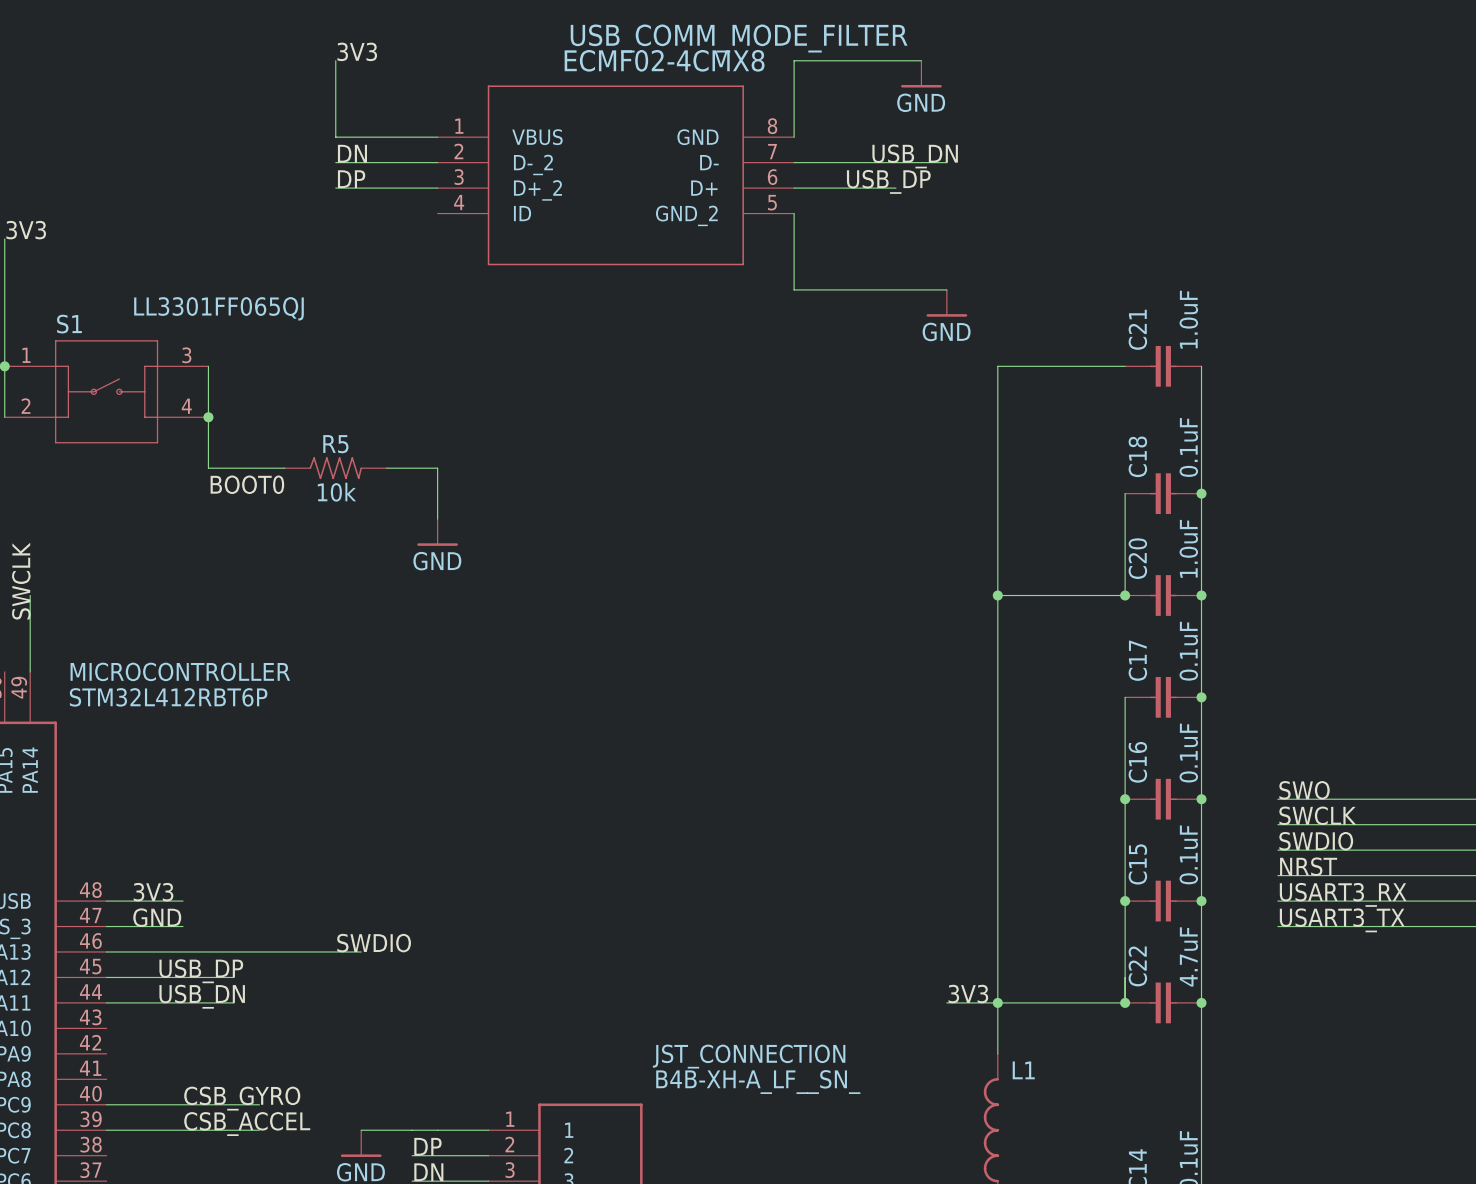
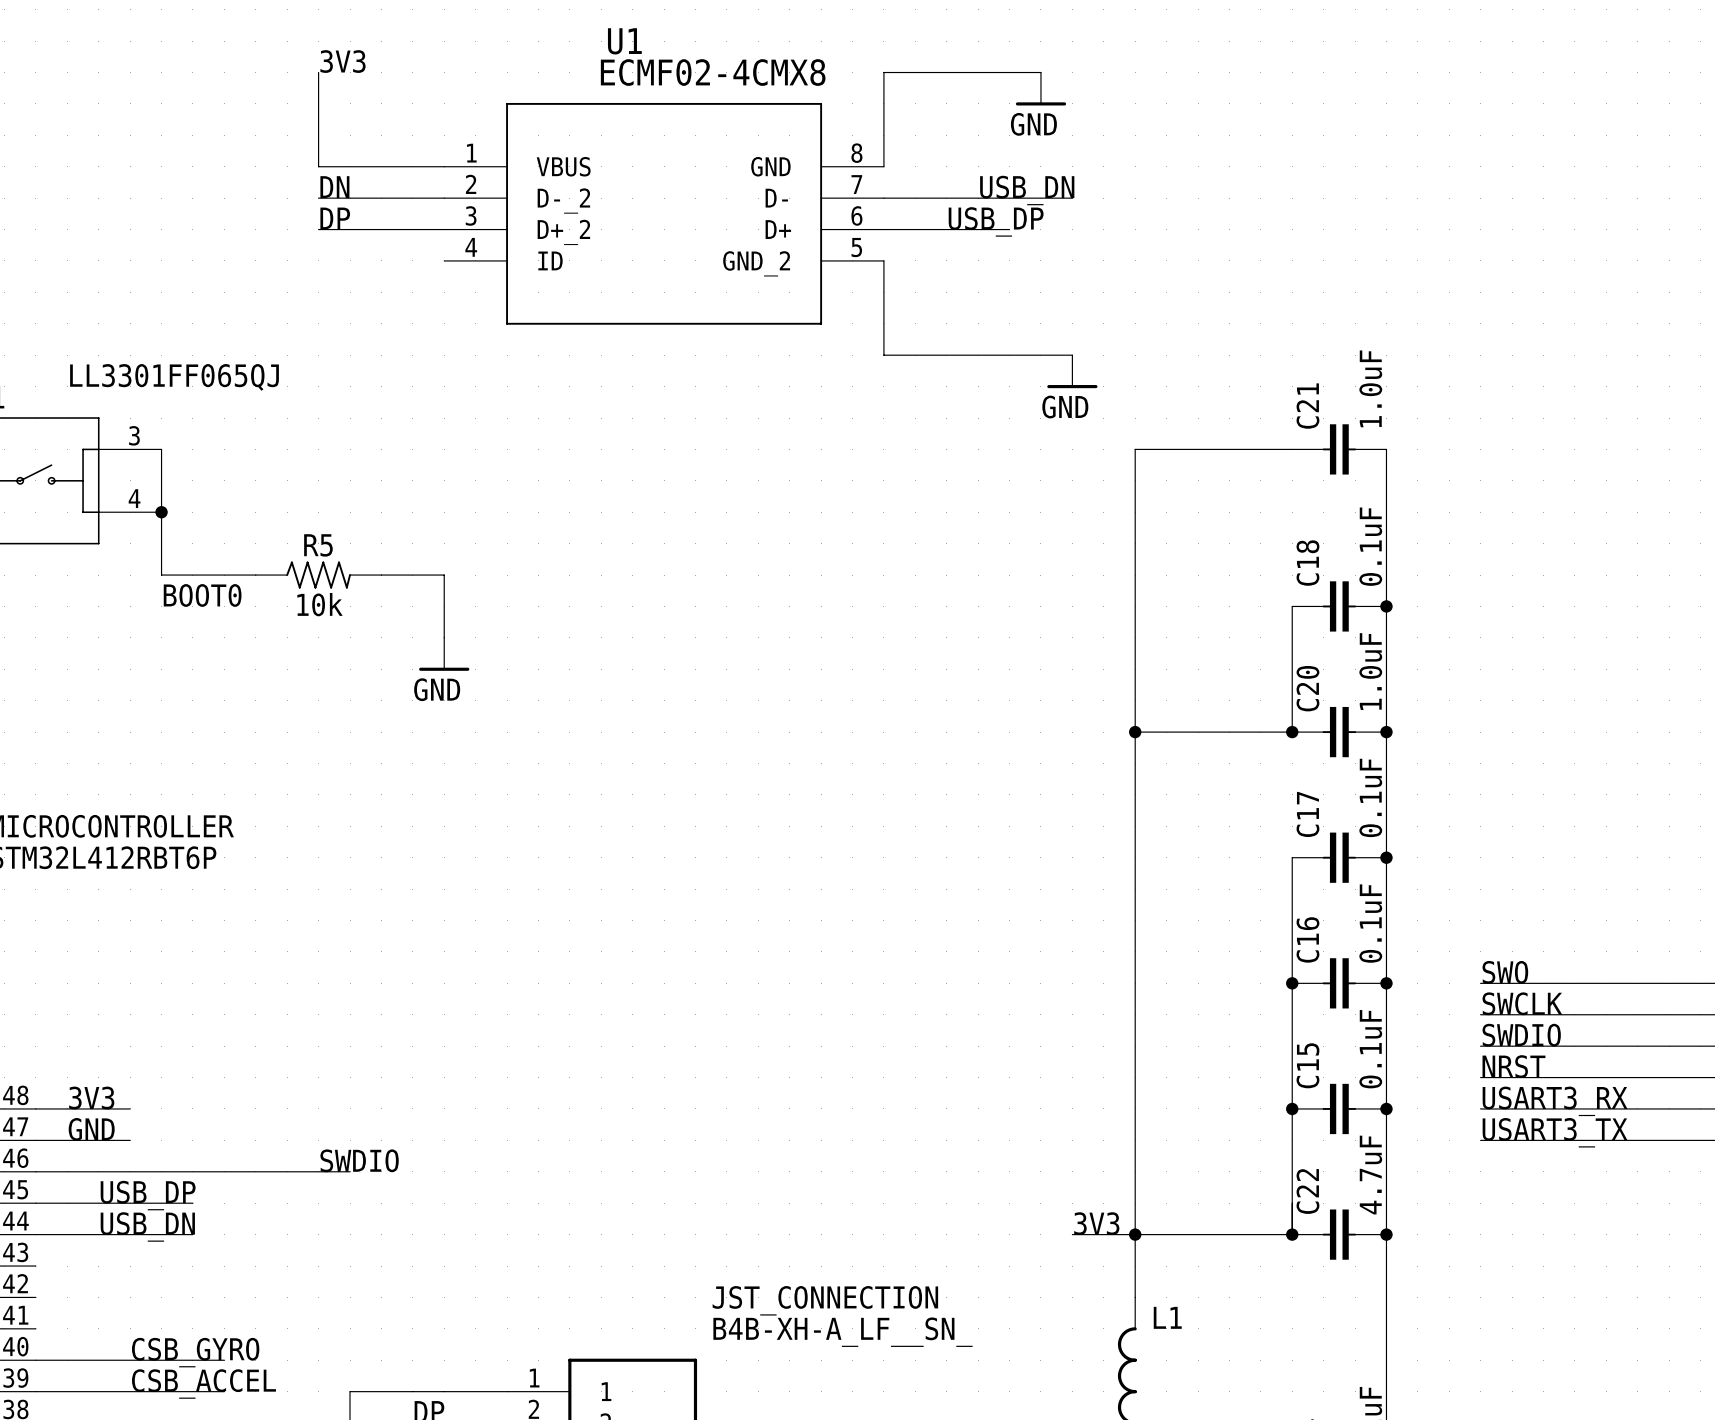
USB_COMM_MODE_FILTER name: USB_COMM_MODE_FILTER (739, 38) -> U1 (624, 41)

